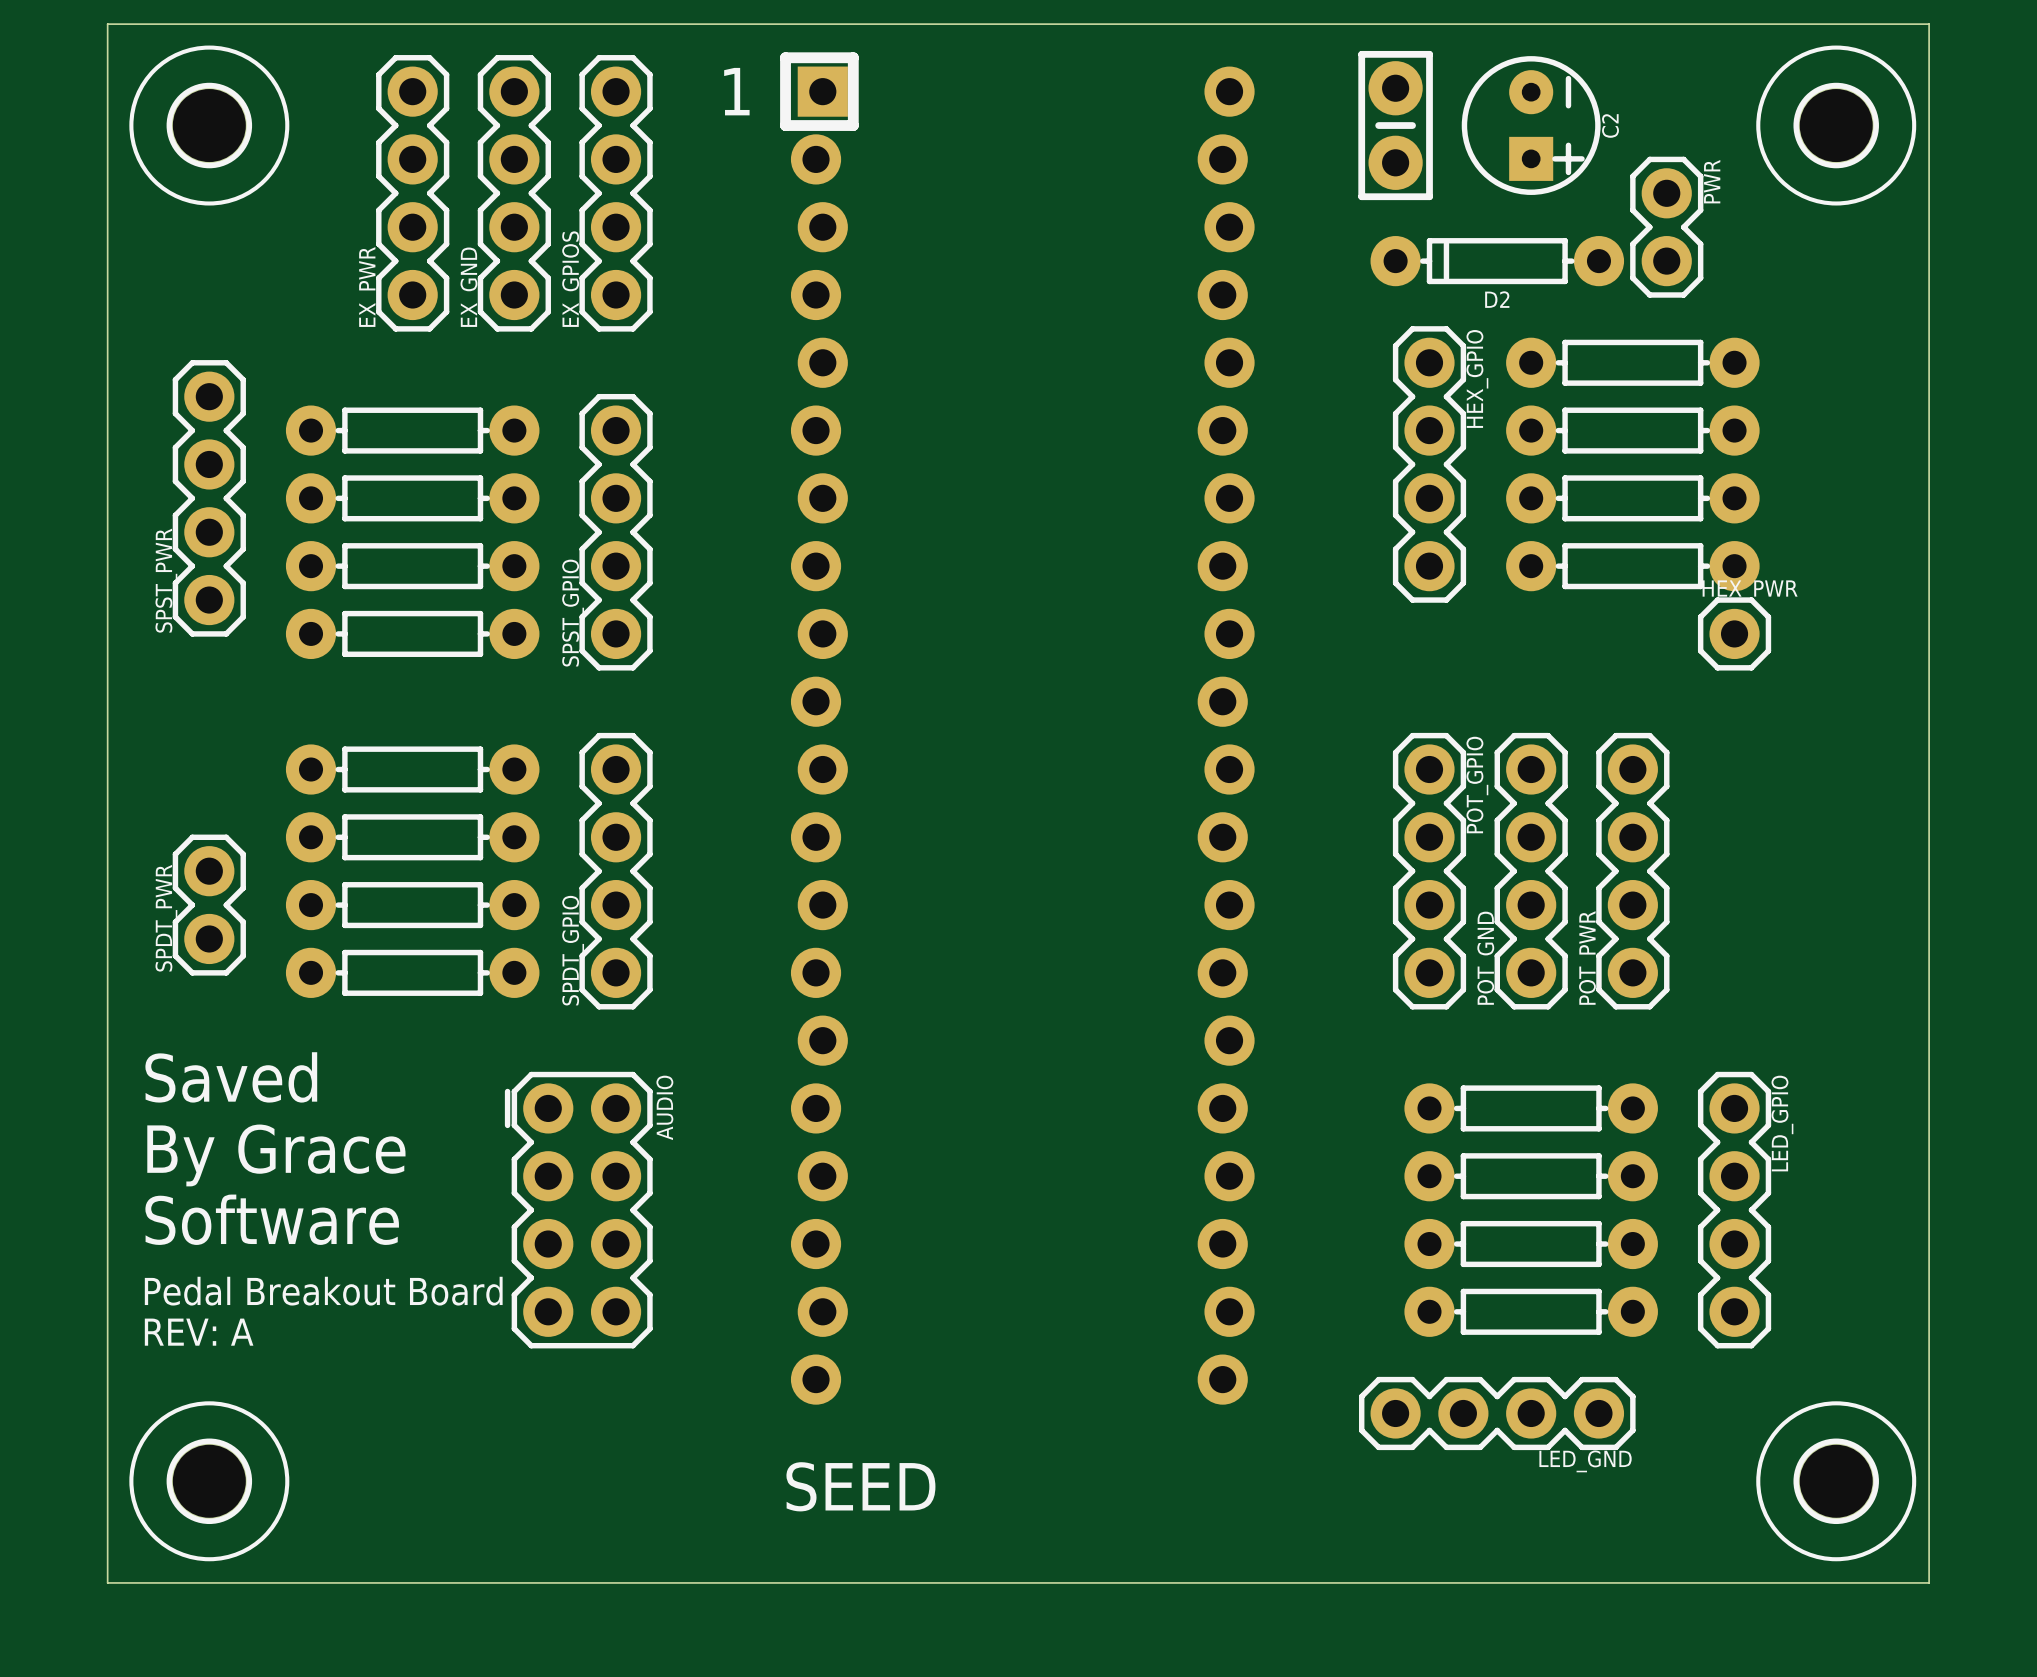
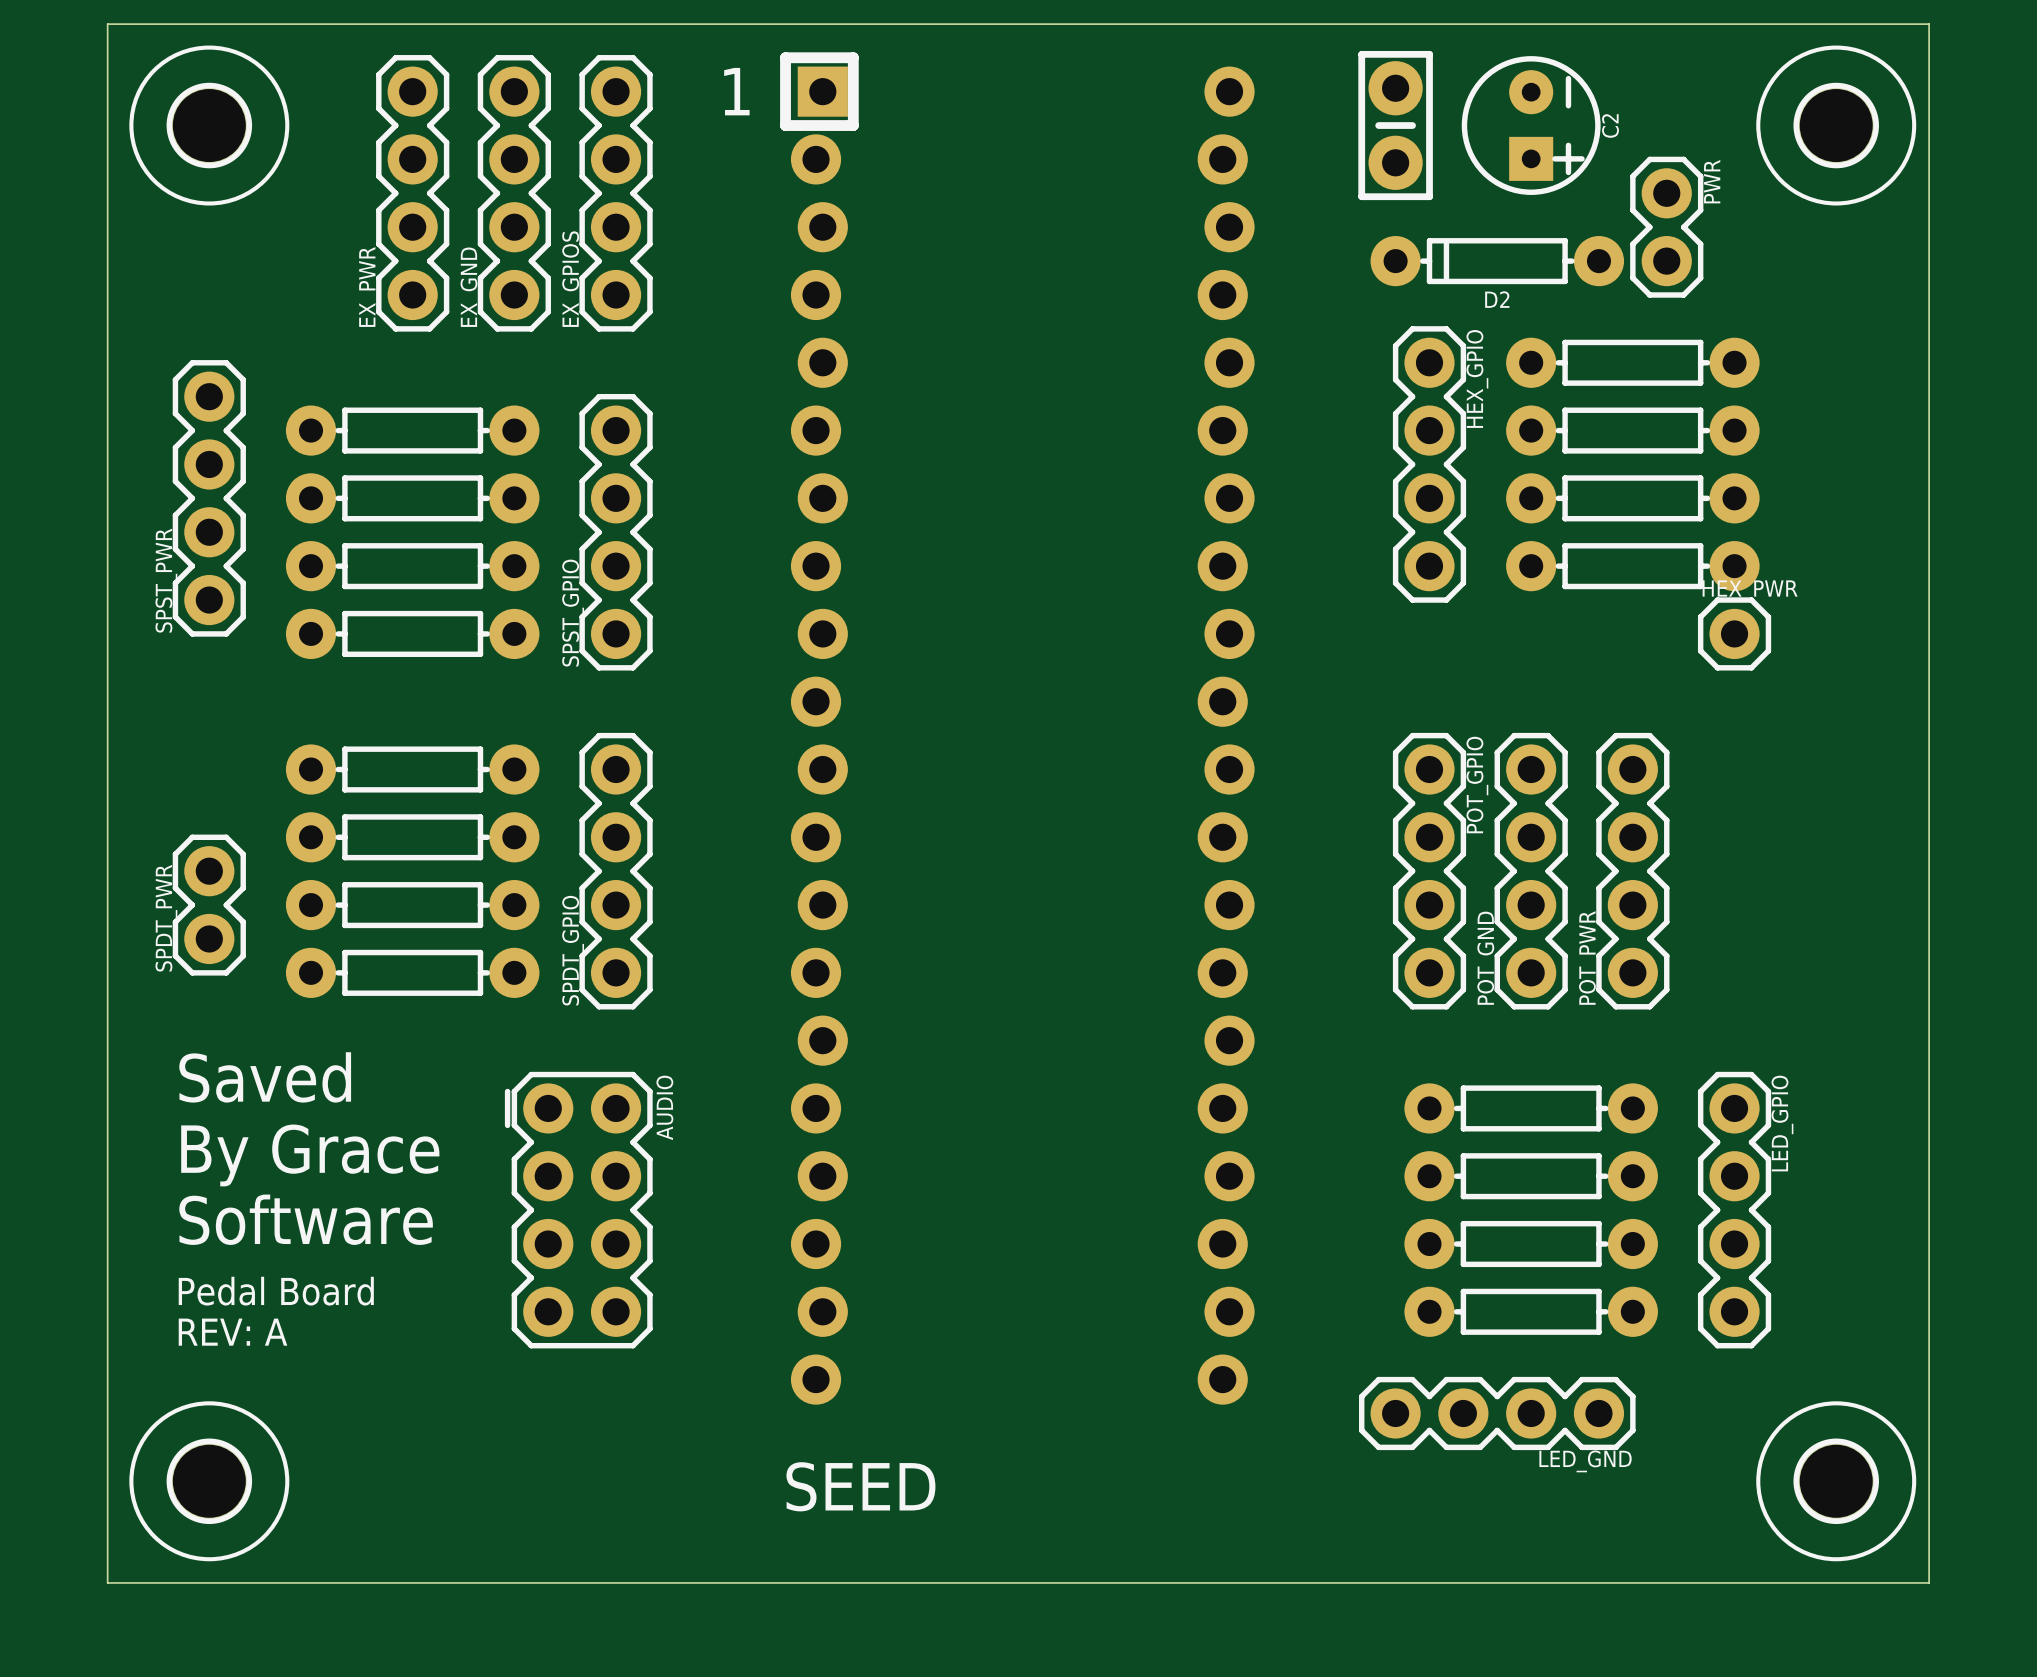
text position: Saved (231, 1077) -> Saved (265, 1077)
text position: By Grace (276, 1155) -> By Grace (310, 1155)
text position: Software (272, 1219) -> Software (306, 1219)
text: Pedal Breakout Board (323, 1291) -> Pedal Board (276, 1291)
text position: REV: A (199, 1332) -> REV: A (233, 1332)

